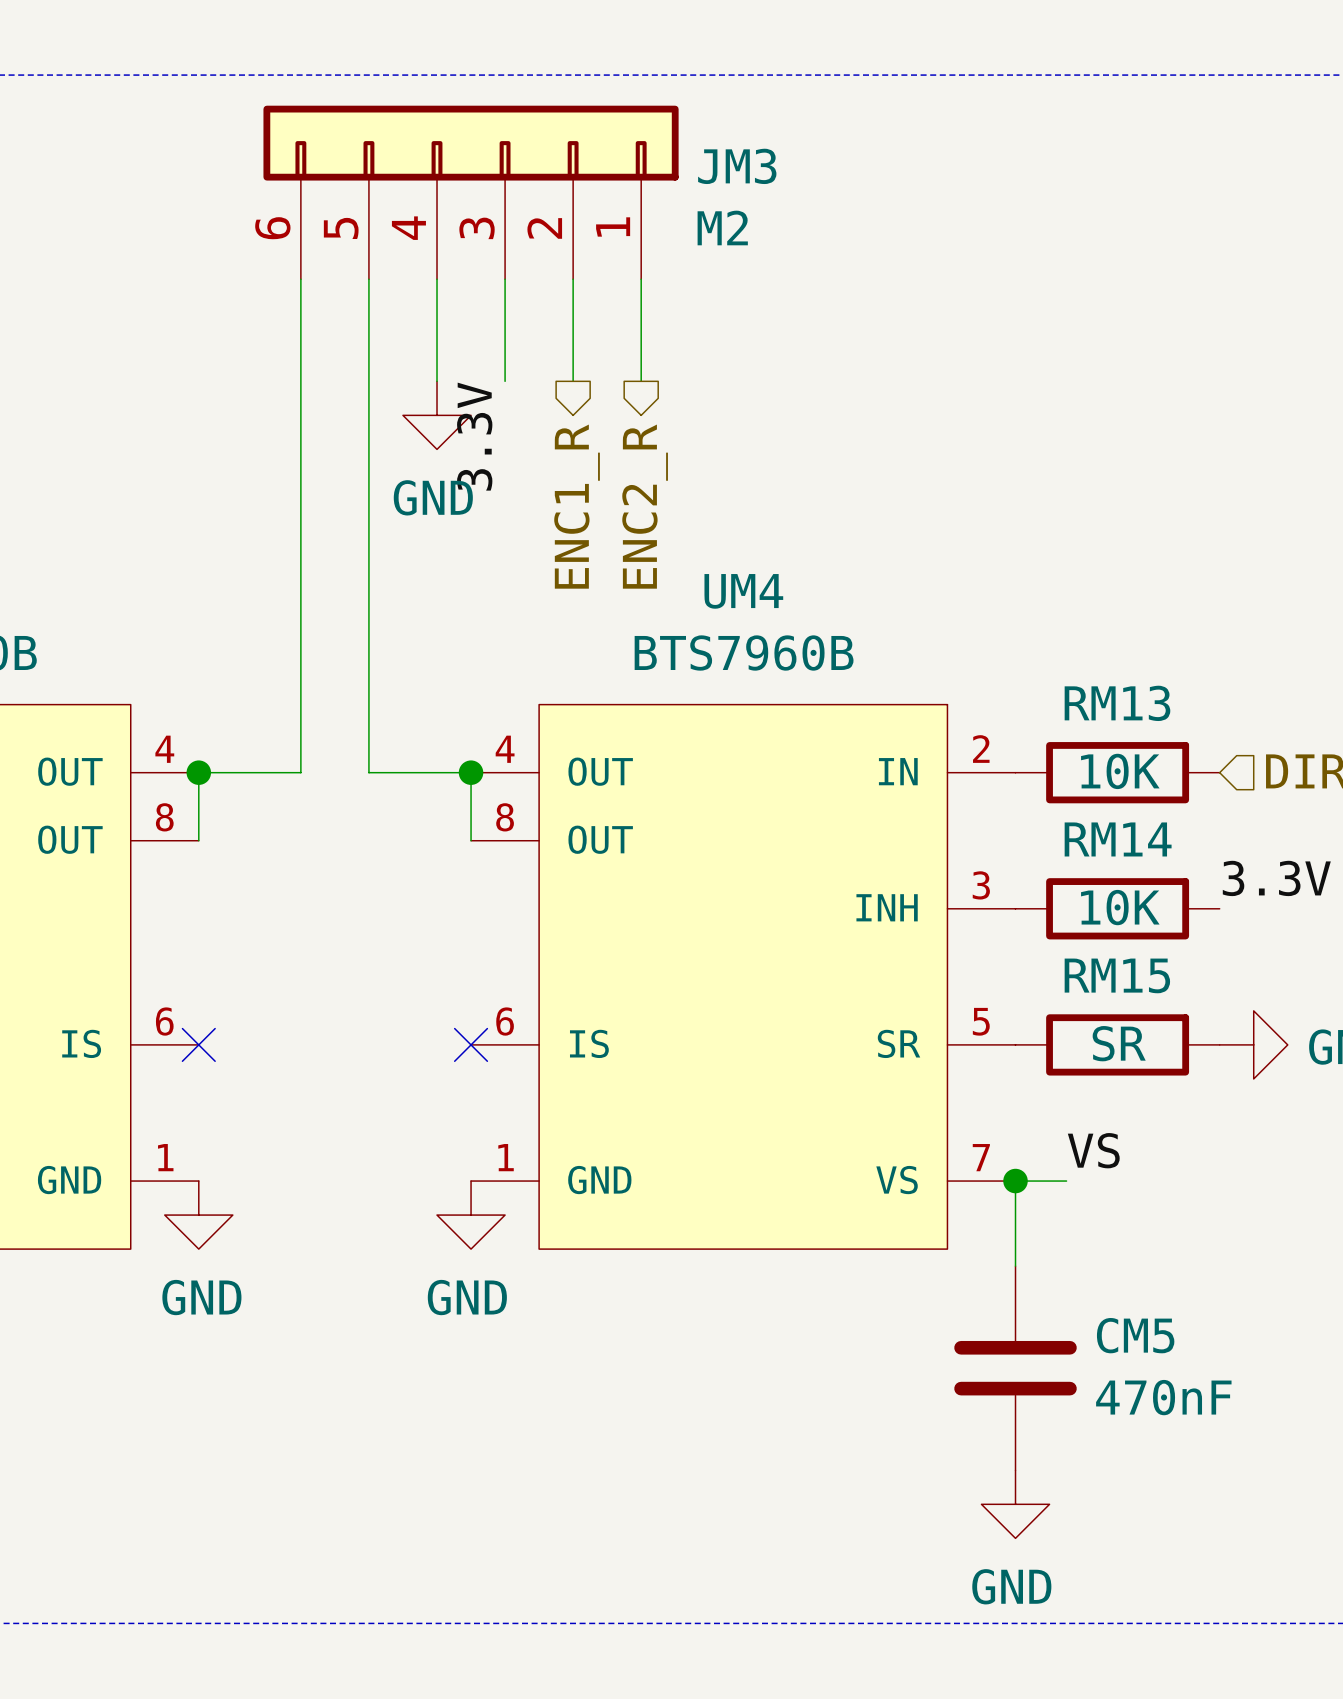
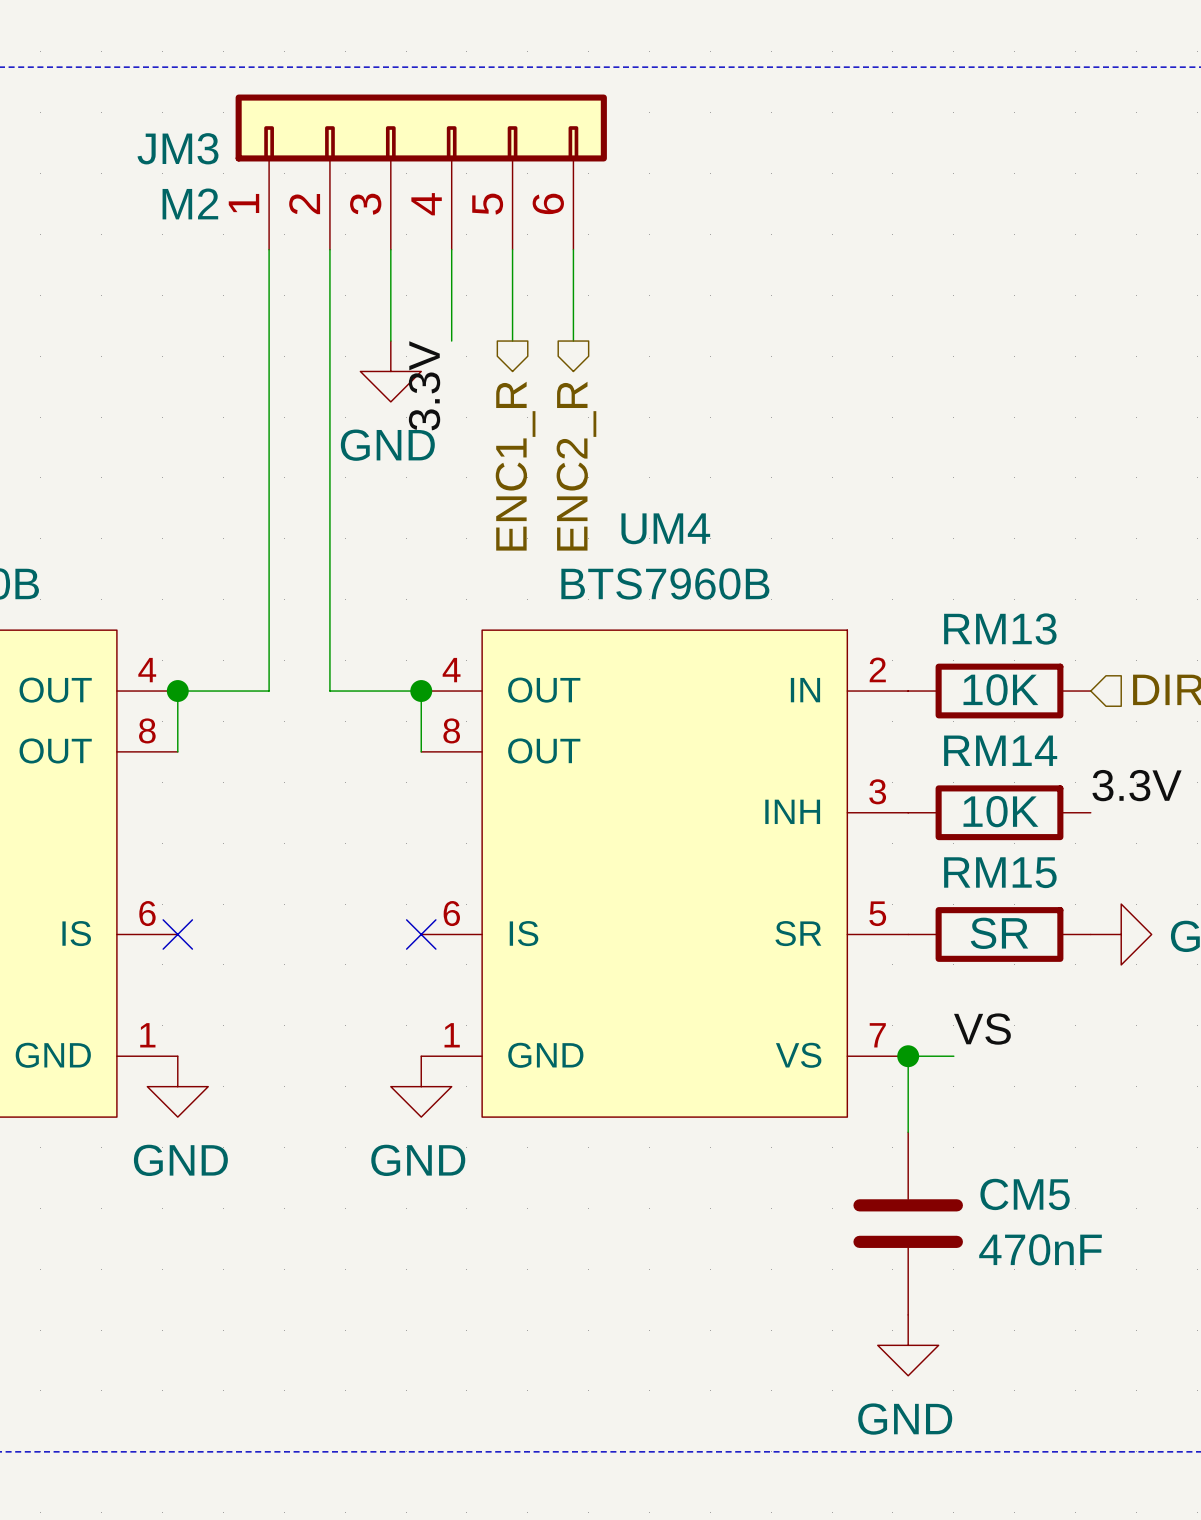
JM3 flip: as is (471, 143) -> left-right (421, 128)

